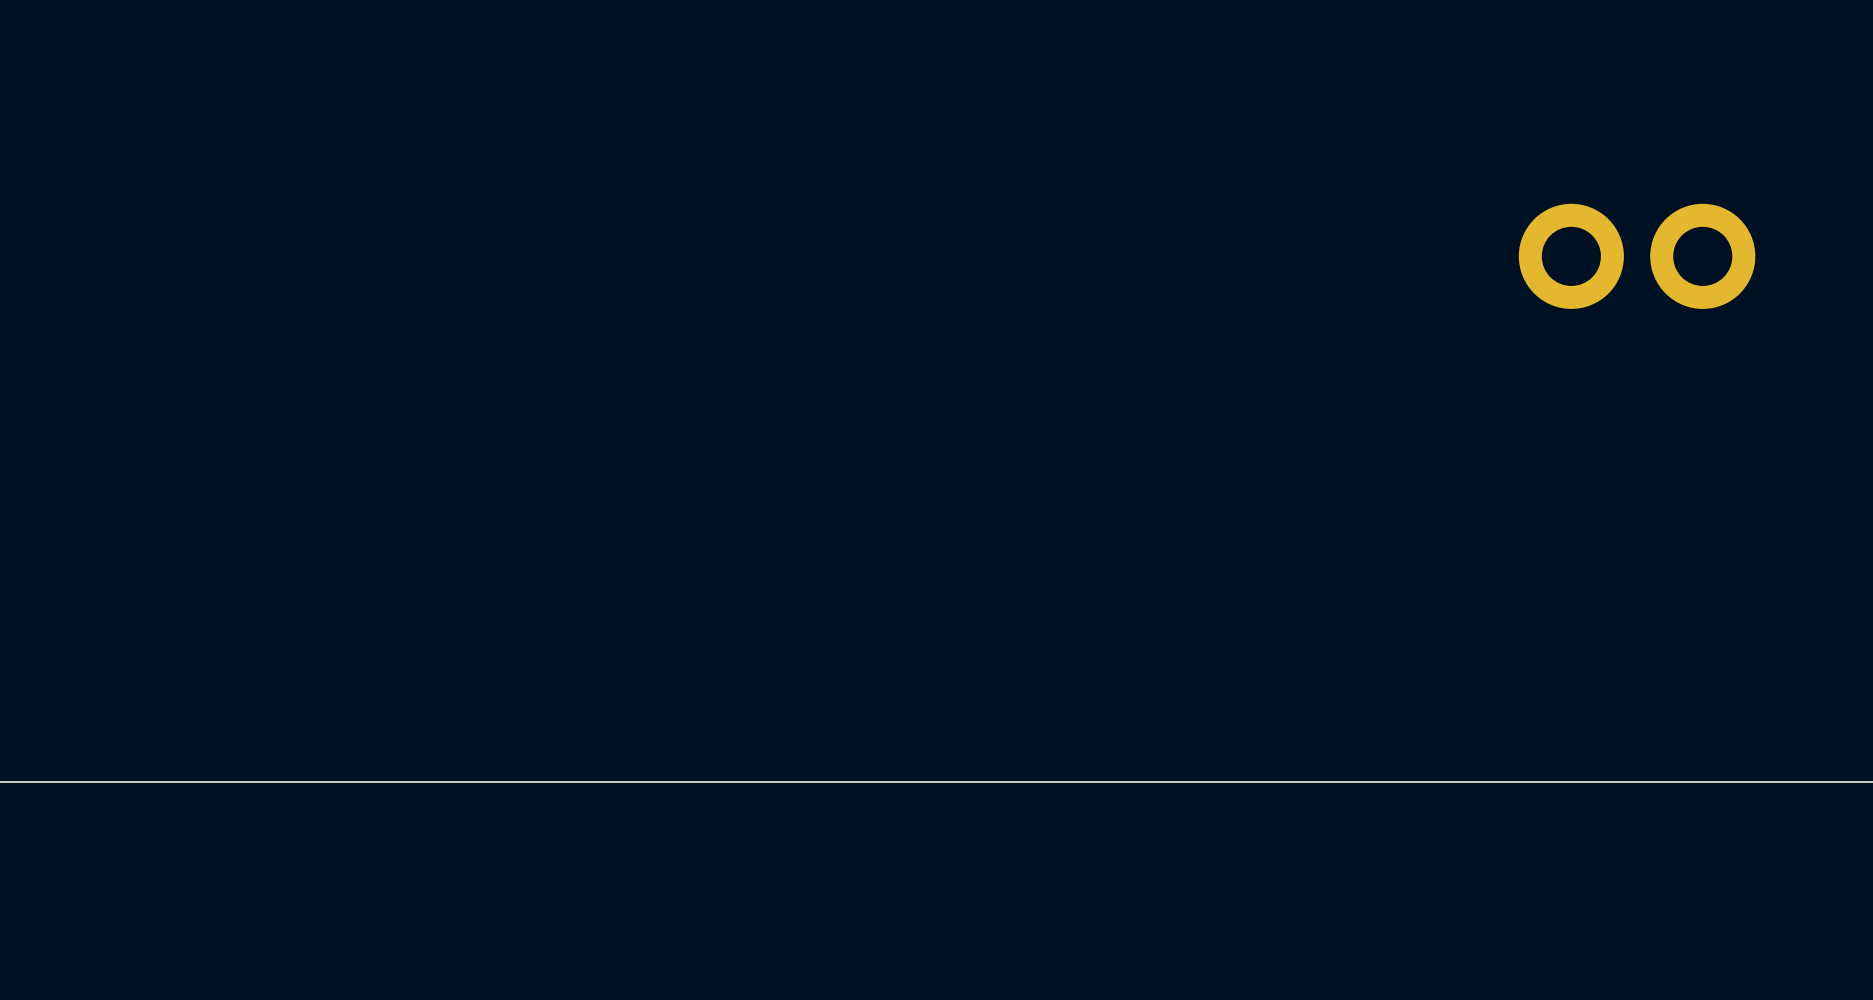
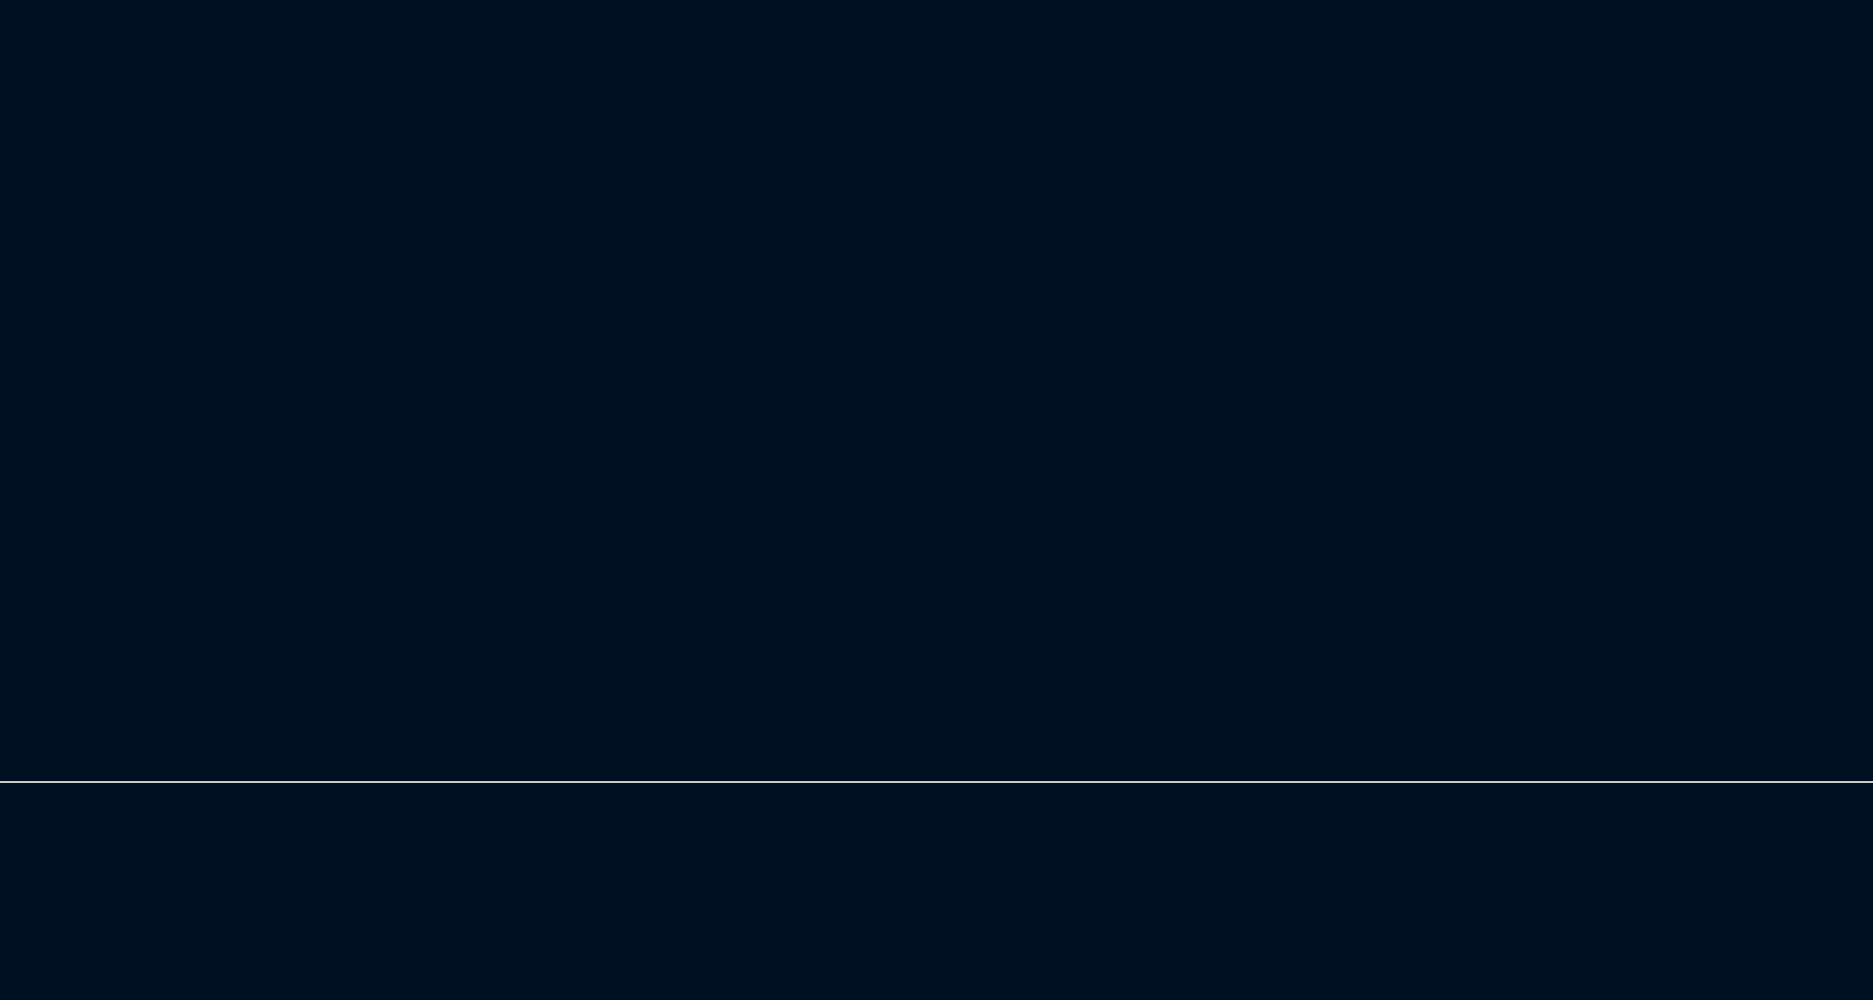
part: (1571, 256) -> none
part: (1702, 256) -> none

